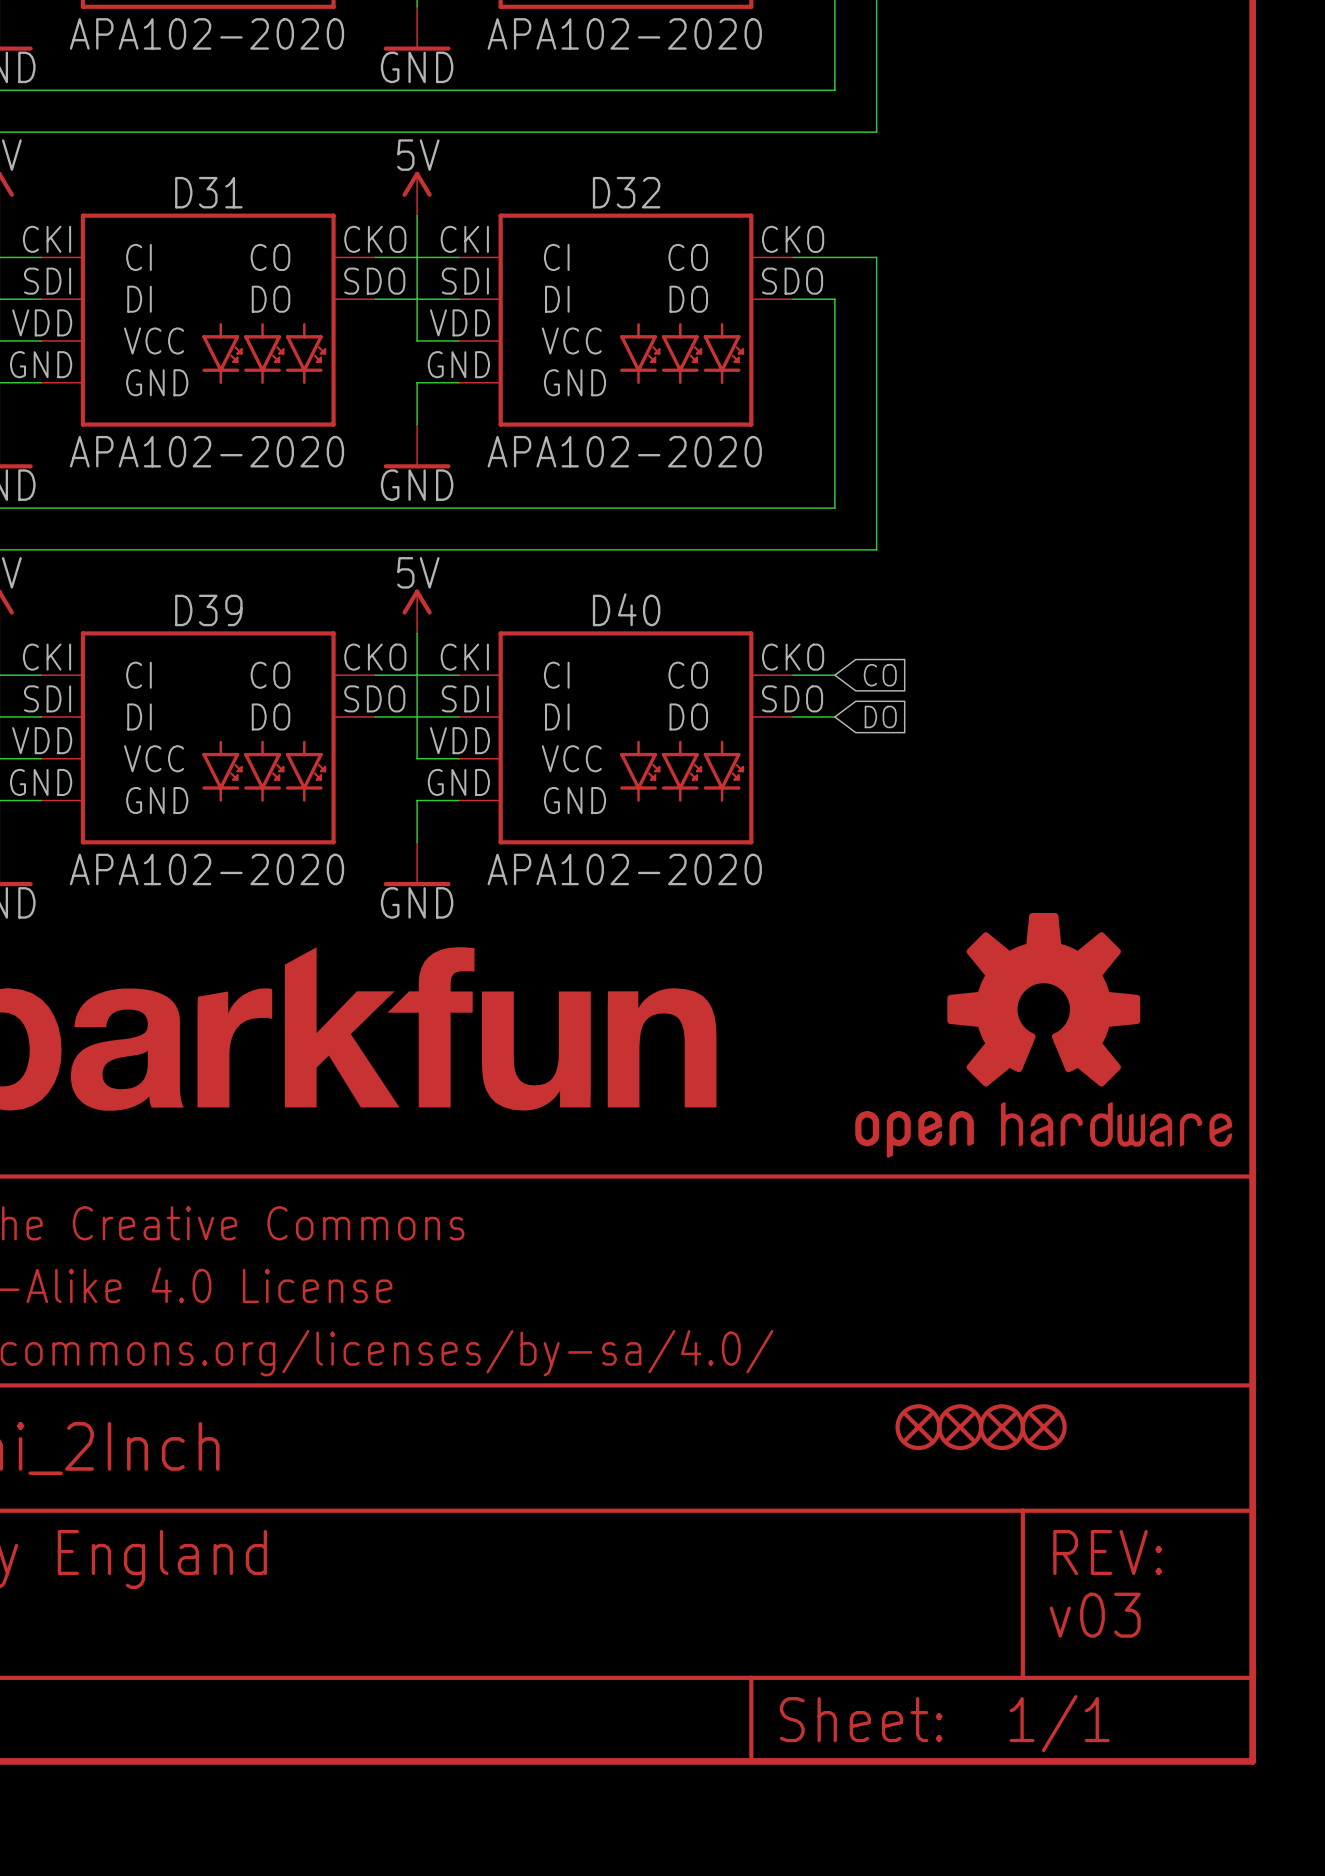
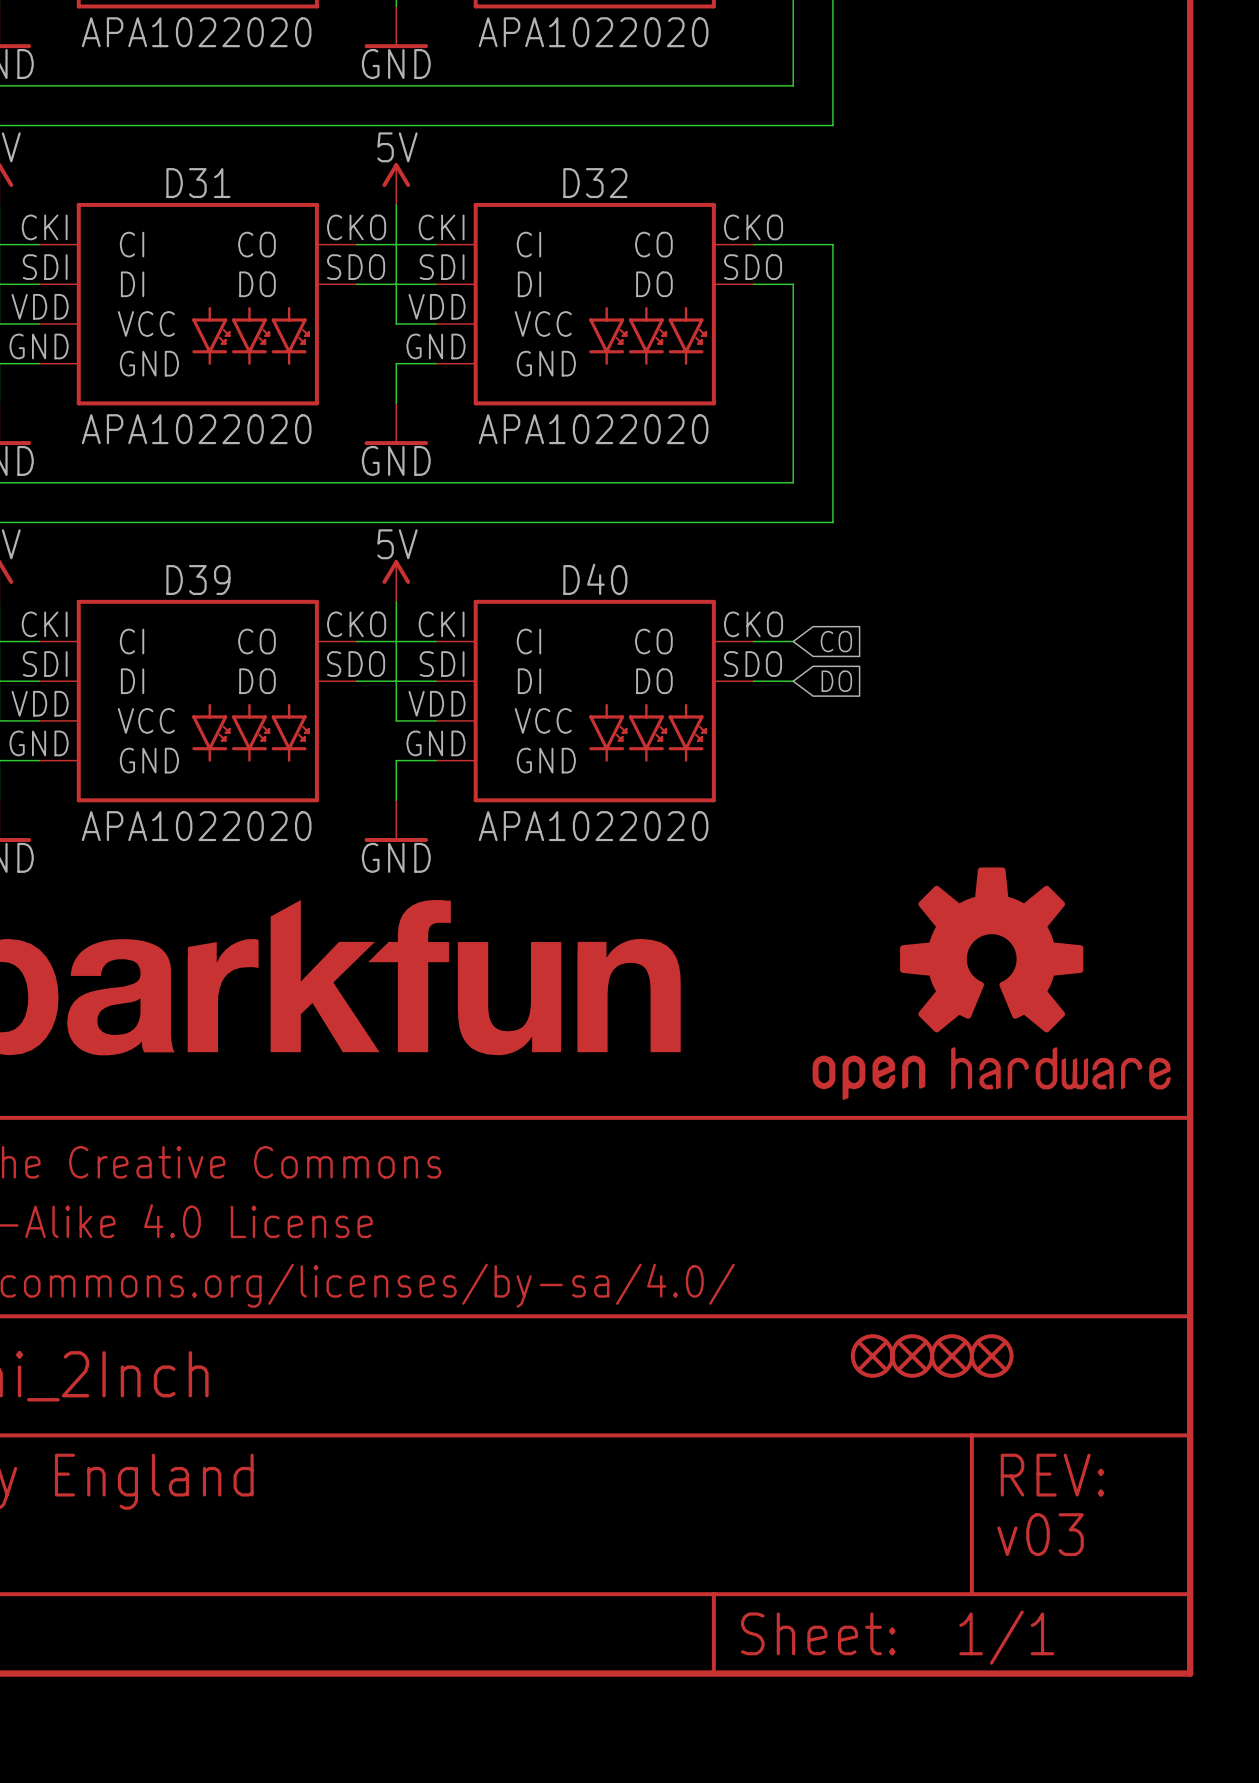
part value: APA102-2020 (206, 33) -> APA1022020 (196, 32)
part value: APA102-2020 (624, 33) -> APA1022020 (593, 32)
D31 value: APA102-2020 (206, 451) -> APA1022020 (196, 429)
D32 value: APA102-2020 (624, 451) -> APA1022020 (593, 429)
D39 value: APA102-2020 (206, 869) -> APA1022020 (196, 826)
D40 value: APA102-2020 (624, 869) -> APA1022020 (593, 826)

